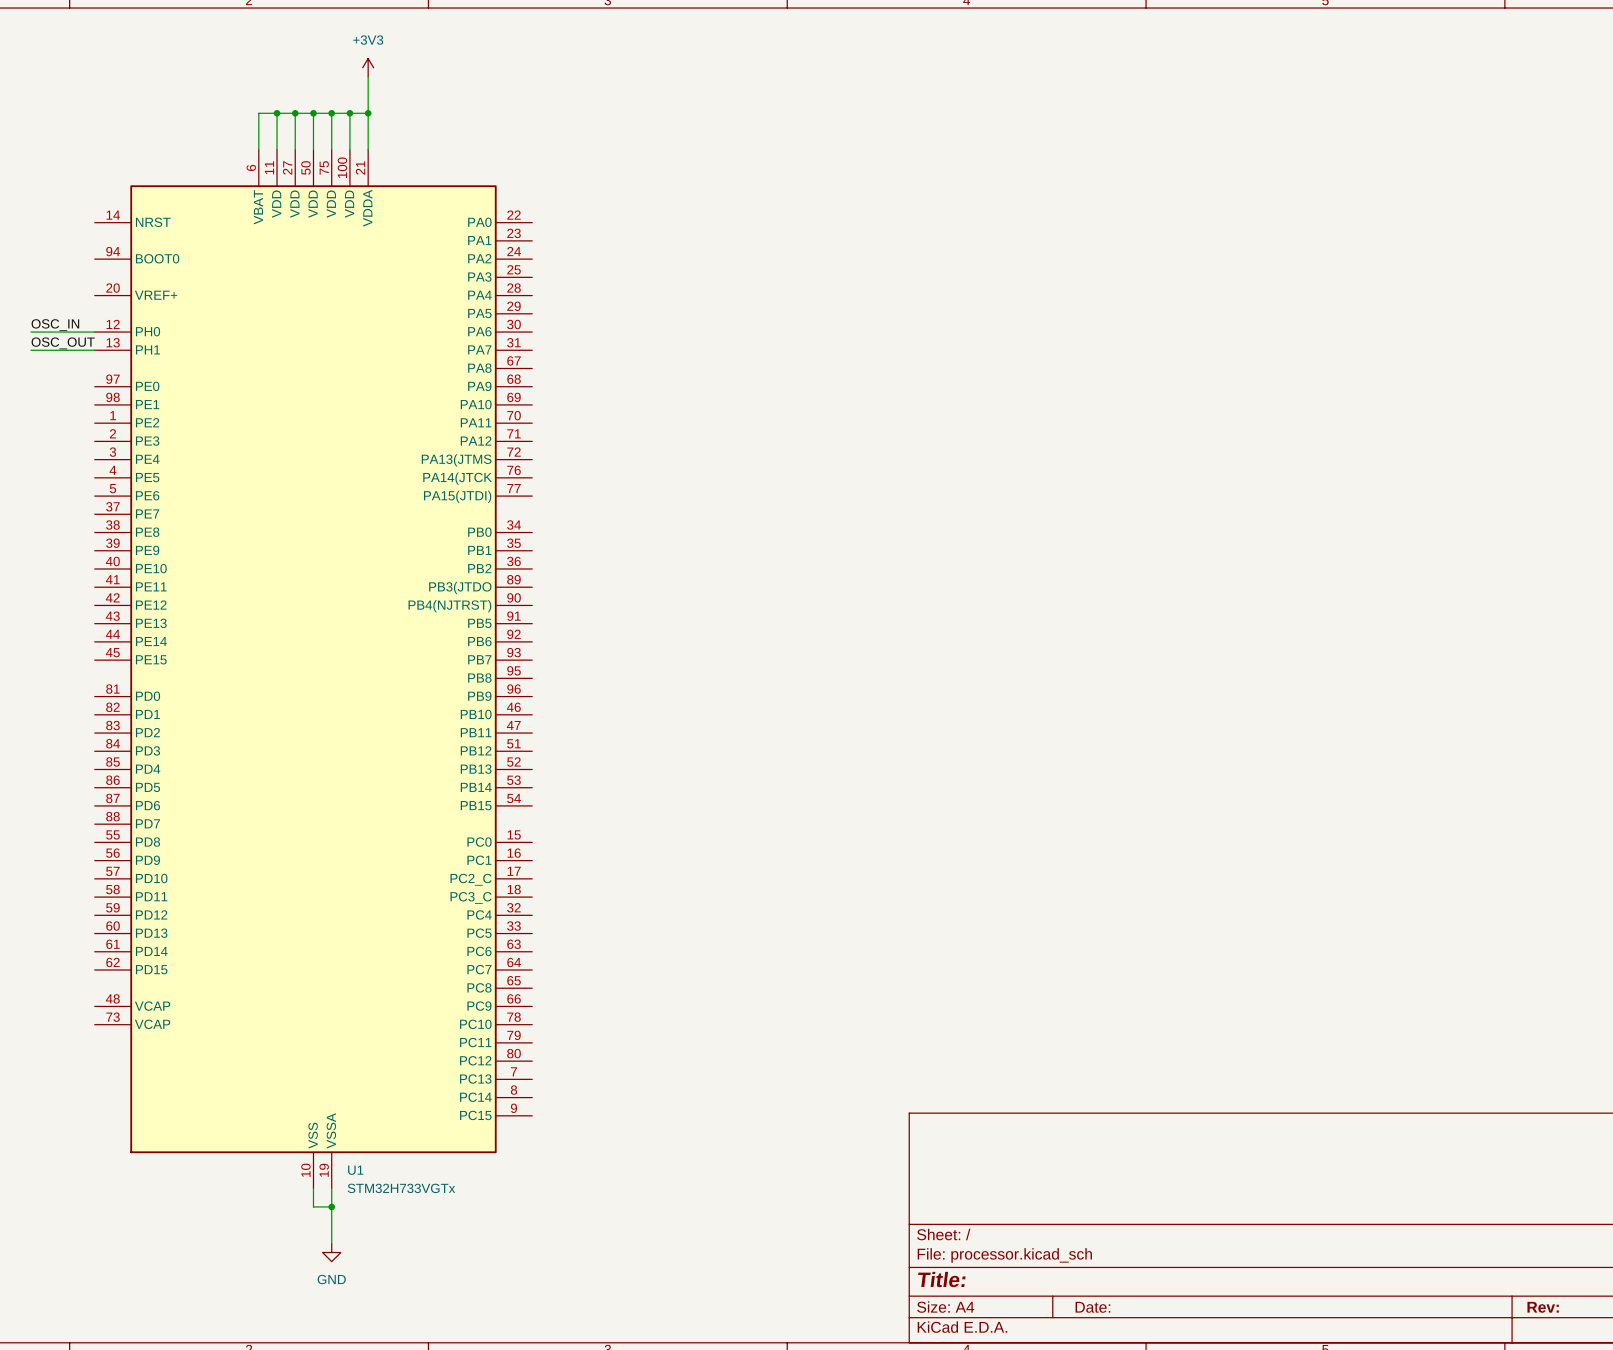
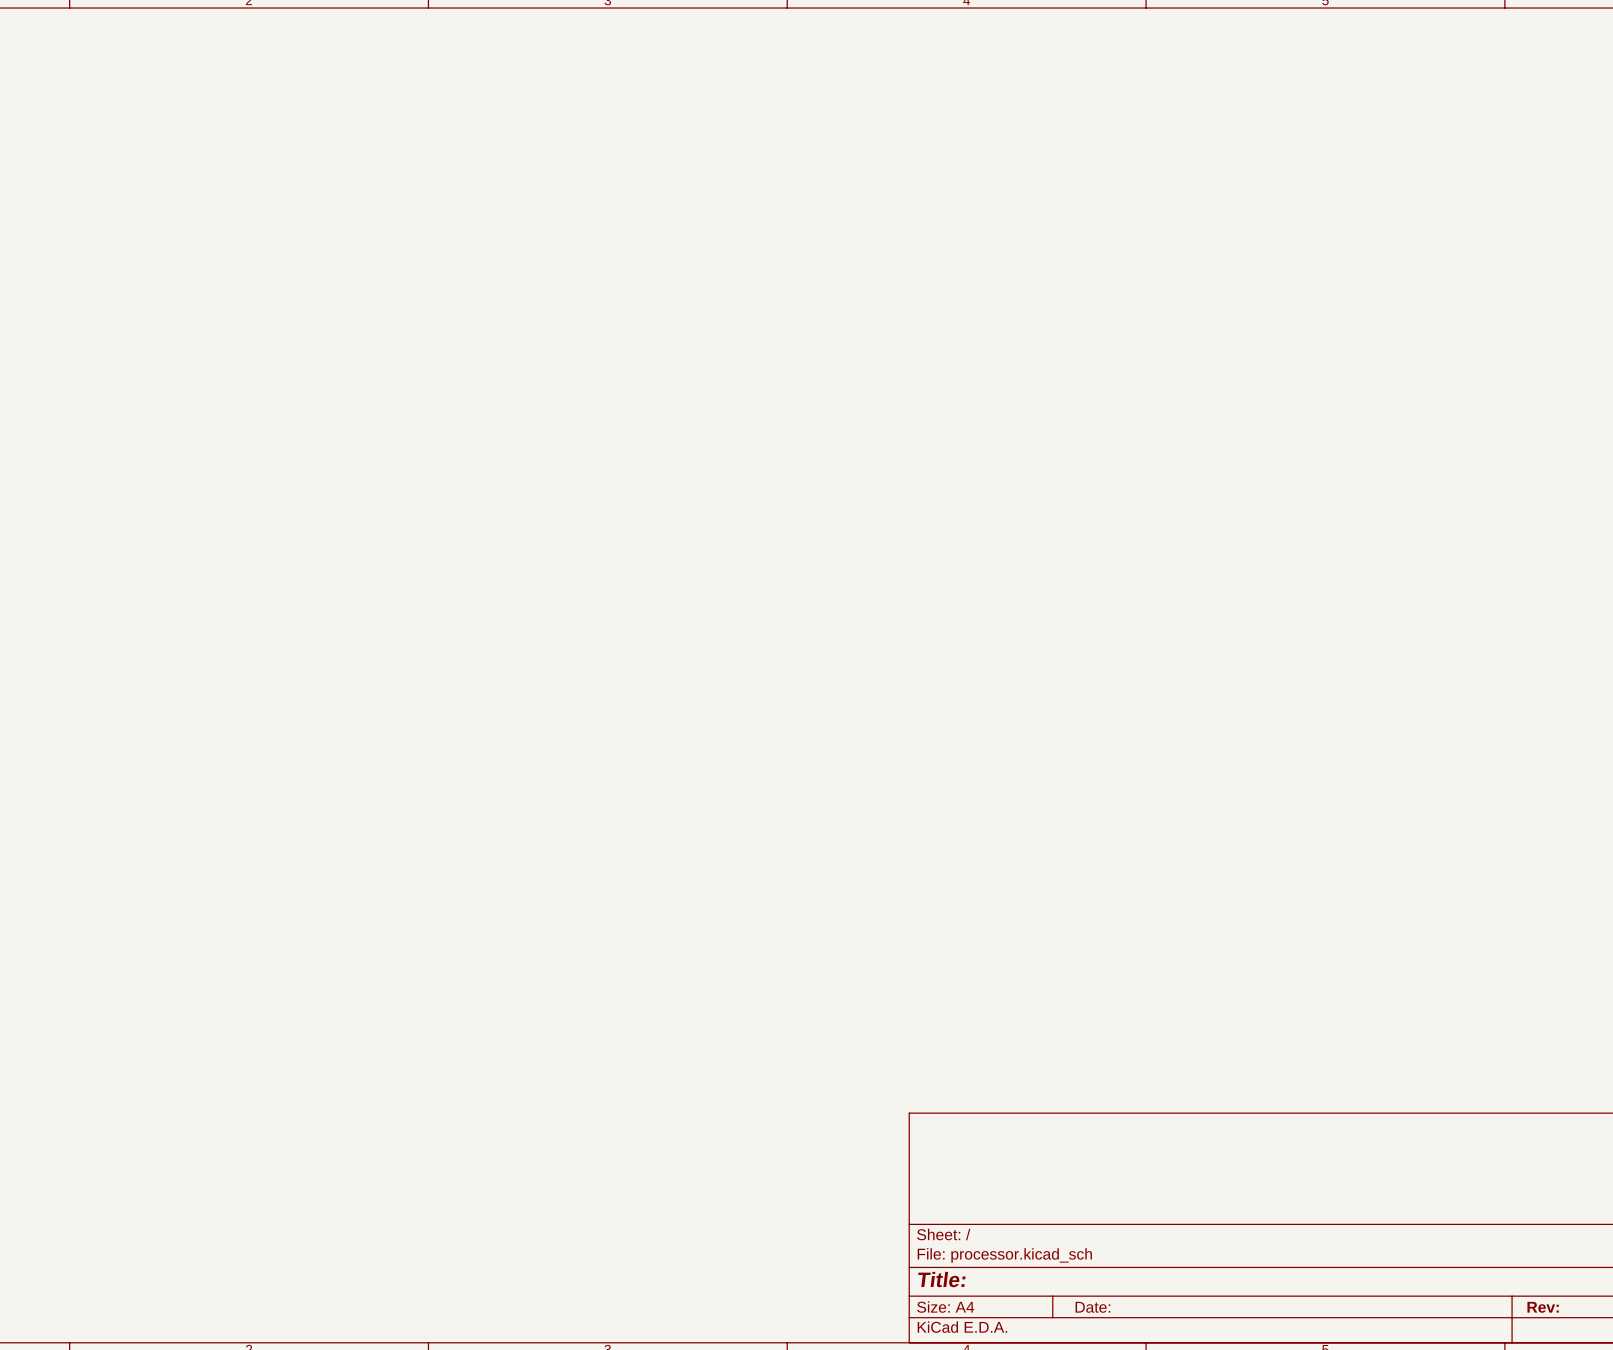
power symbol: +3V3 (368, 67) -> none
wire: (368, 76) (368, 149) -> none
wire: (277, 113) (277, 149) -> none
junction: (277, 113) -> none
wire: (295, 113) (295, 149) -> none
junction: (295, 113) -> none
wire: (313, 113) (313, 149) -> none
junction: (313, 113) -> none
wire: (331, 113) (331, 149) -> none
junction: (331, 113) -> none
wire: (349, 113) (349, 149) -> none
junction: (349, 113) -> none
wire: (368, 113) (258, 113) (258, 149) -> none
junction: (368, 113) -> none
label: OSC_IN (55, 325) -> none
wire: (30, 332) (94, 332) -> none
label: OSC_OUT (63, 343) -> none
wire: (30, 350) (94, 350) -> none
U1: STM32H733VGTx (313, 669) -> none
wire: (313, 1188) (313, 1206) (331, 1206) -> none
wire: (331, 1188) (331, 1243) -> none
junction: (331, 1206) -> none
power symbol: GND (331, 1252) -> none

